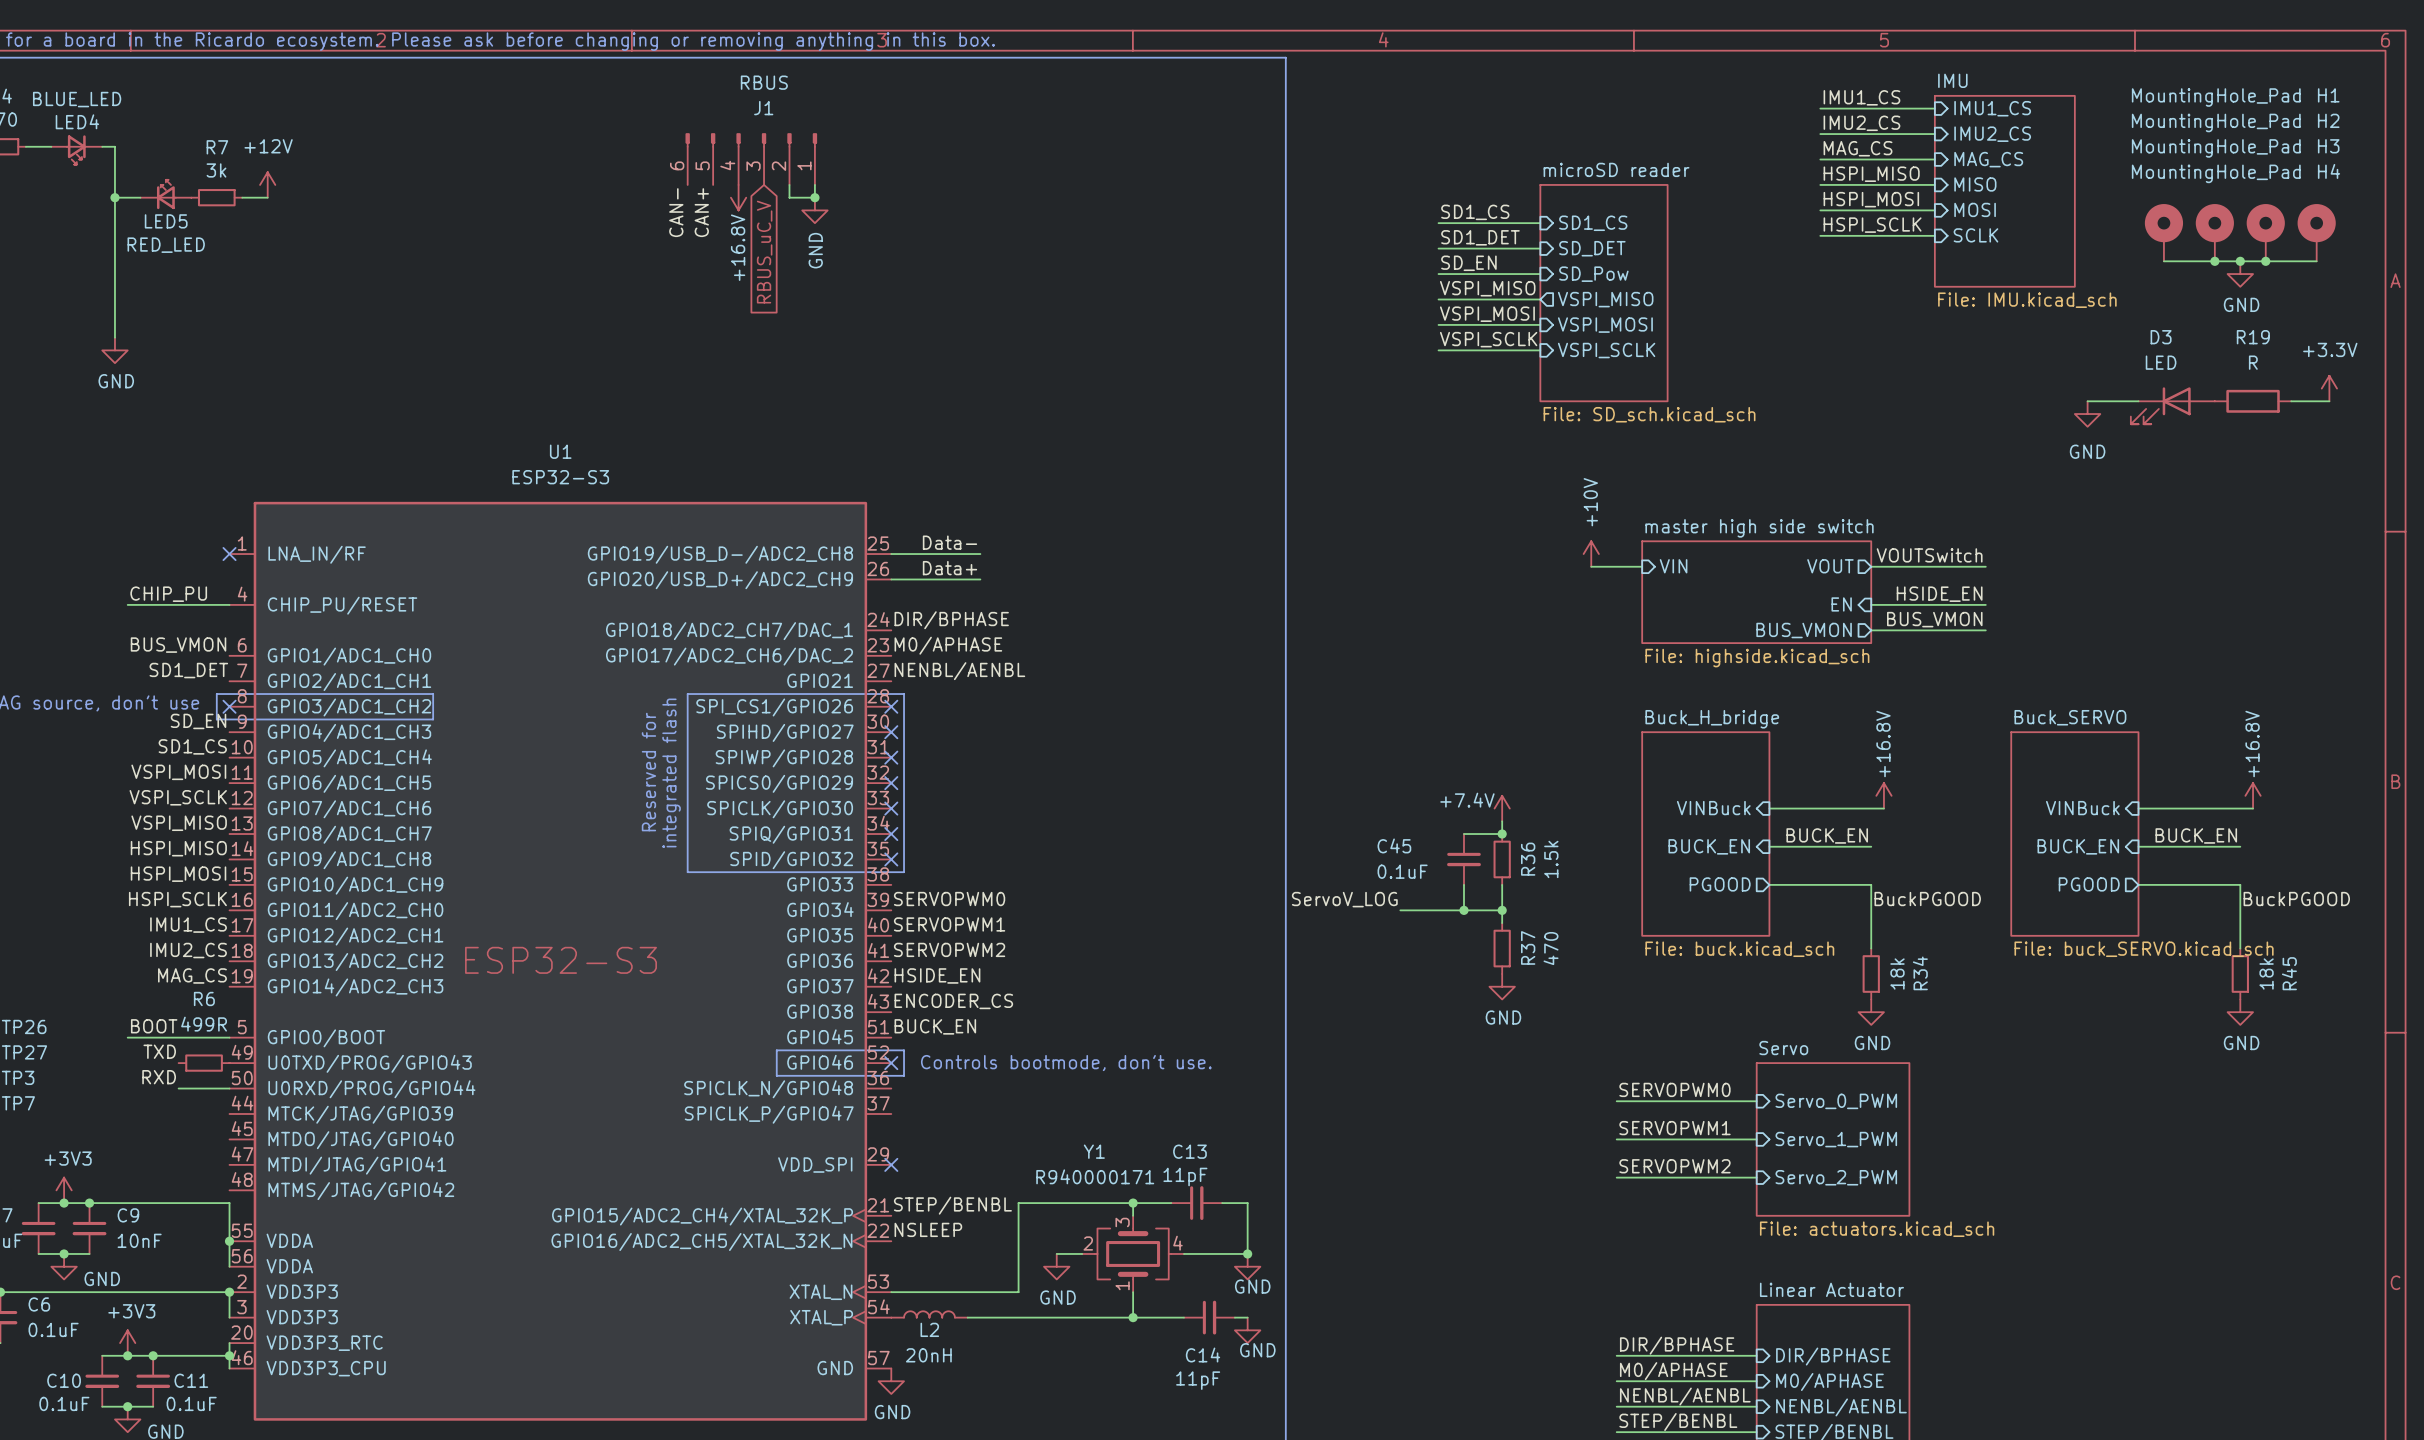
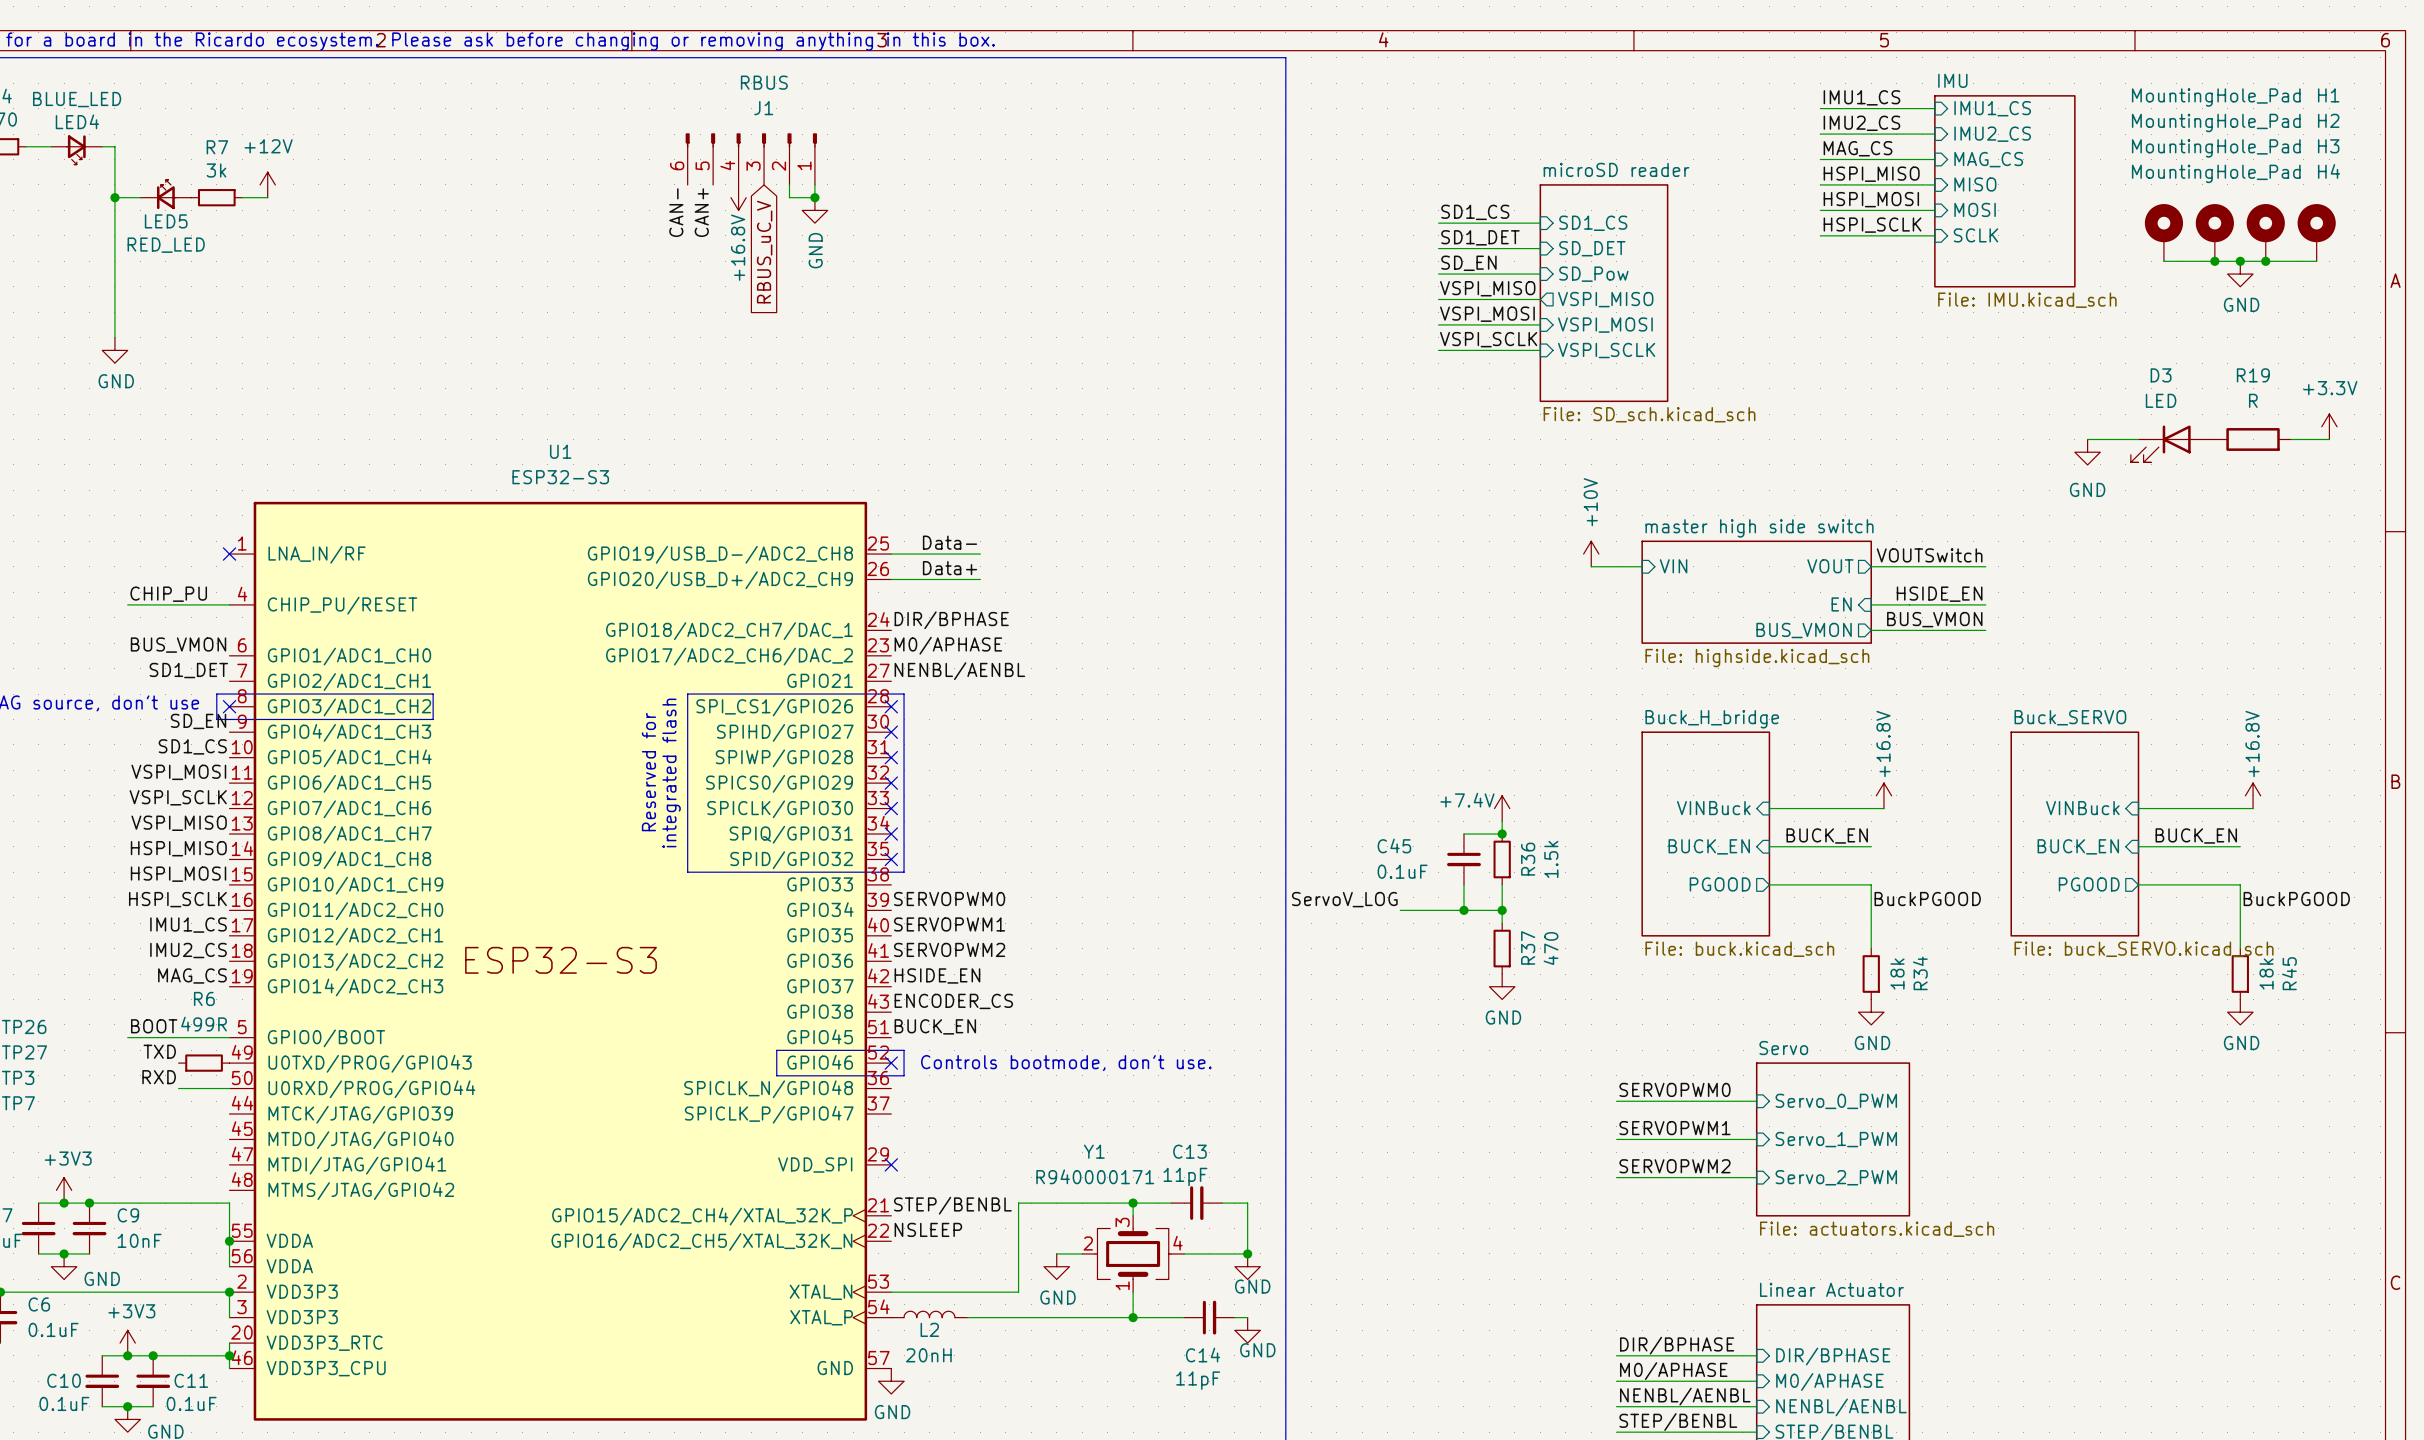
power symbol position: +3.3V (2329, 388) -> +3.3V (2329, 426)
wire: (2087, 401) (2138, 401) -> (2087, 439) (2138, 439)
R19 position: (2253, 401) -> (2253, 439)
wire: (2291, 401) (2329, 401) -> (2291, 439) (2329, 439)
D3 position: (2172, 405) -> (2172, 443)
power symbol position: GND (2087, 414) -> GND (2087, 452)

